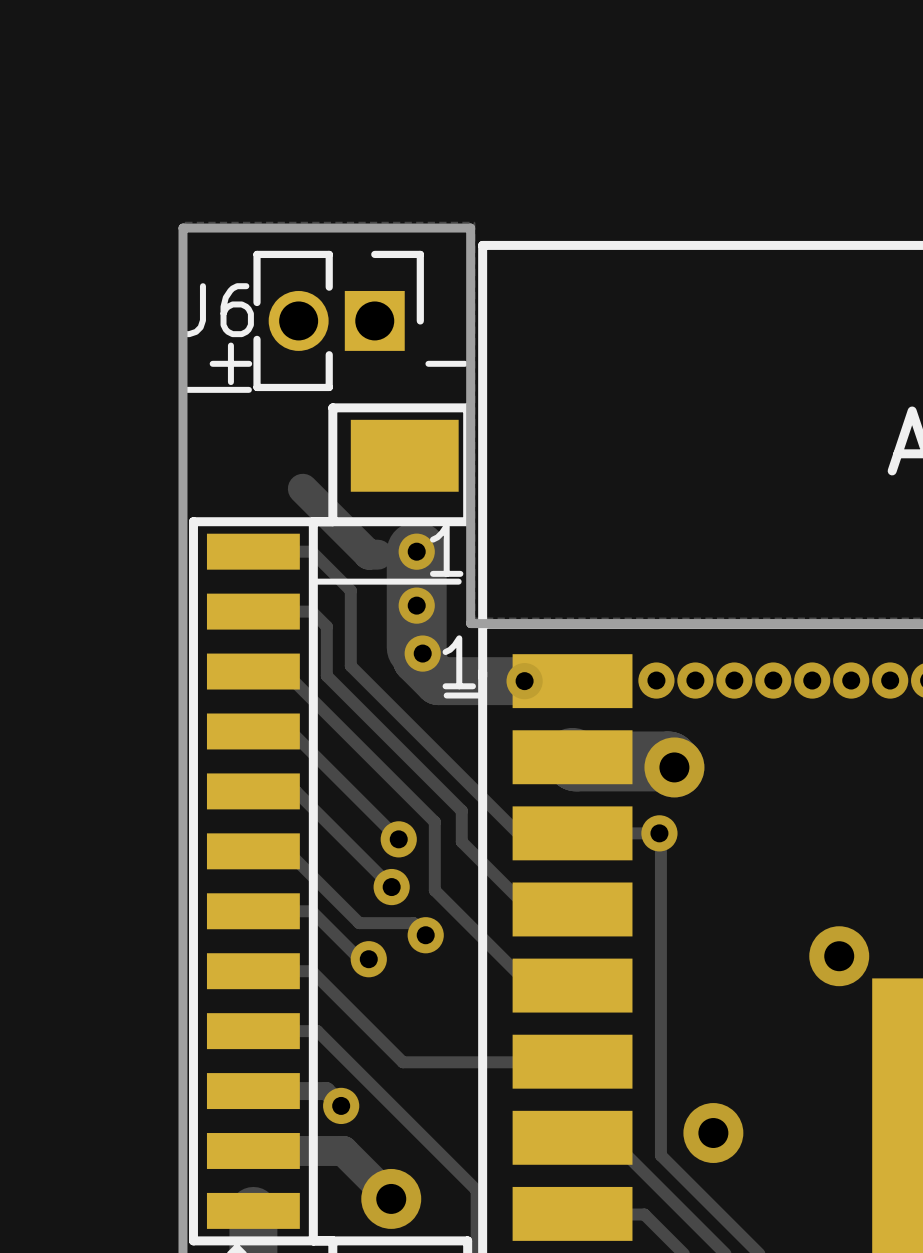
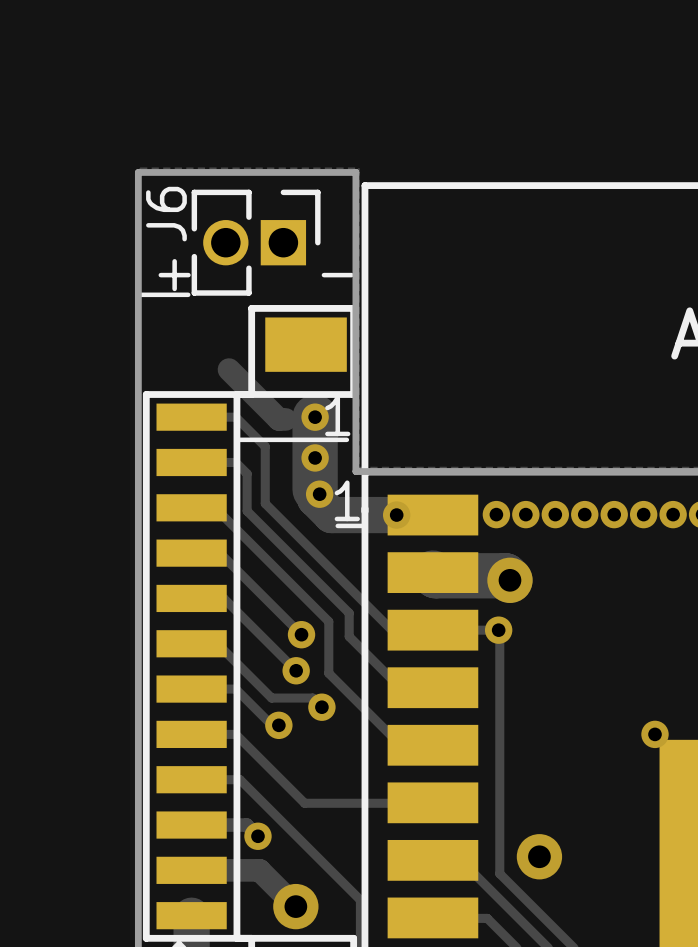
J6 name rotation: 0° (217, 310) -> 90° counterclockwise (166, 214)
via size: [809, 926, 870, 987] -> [641, 720, 669, 749]

